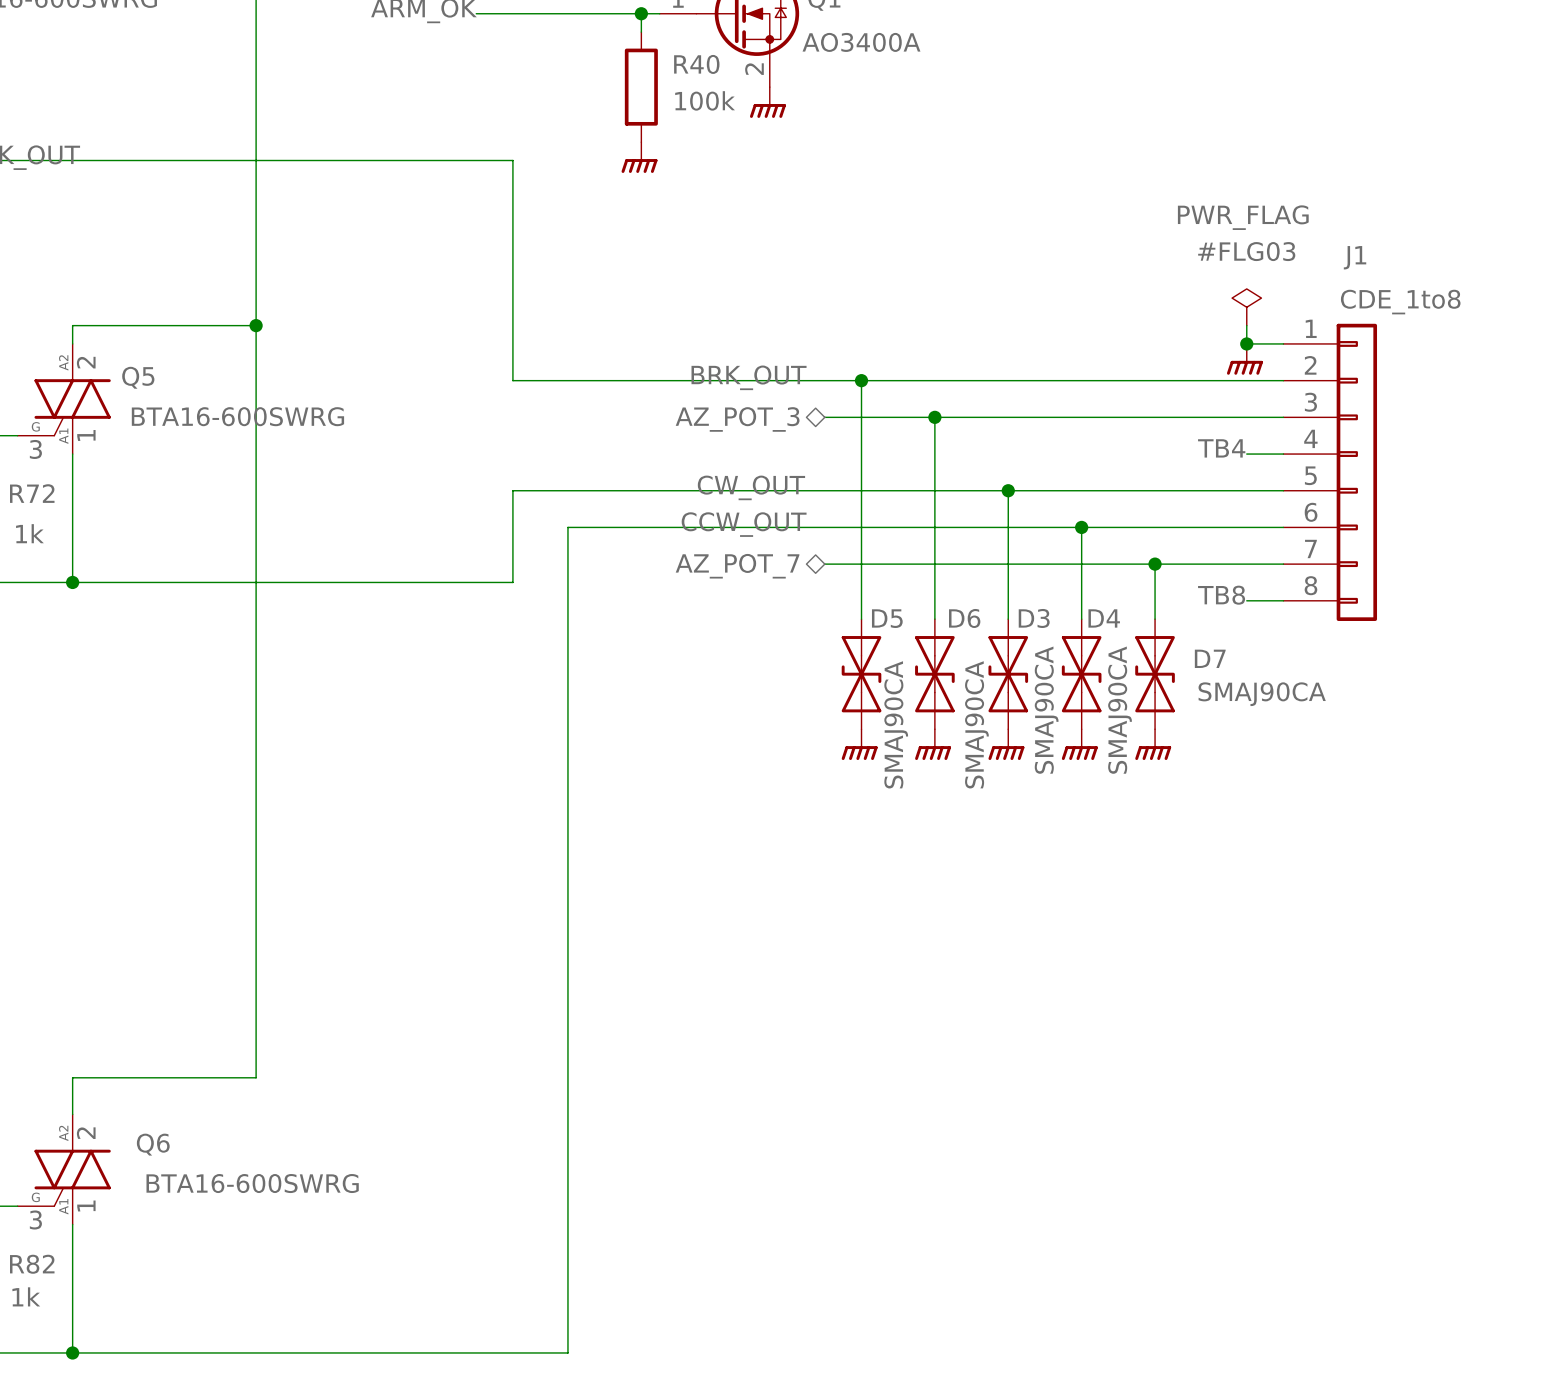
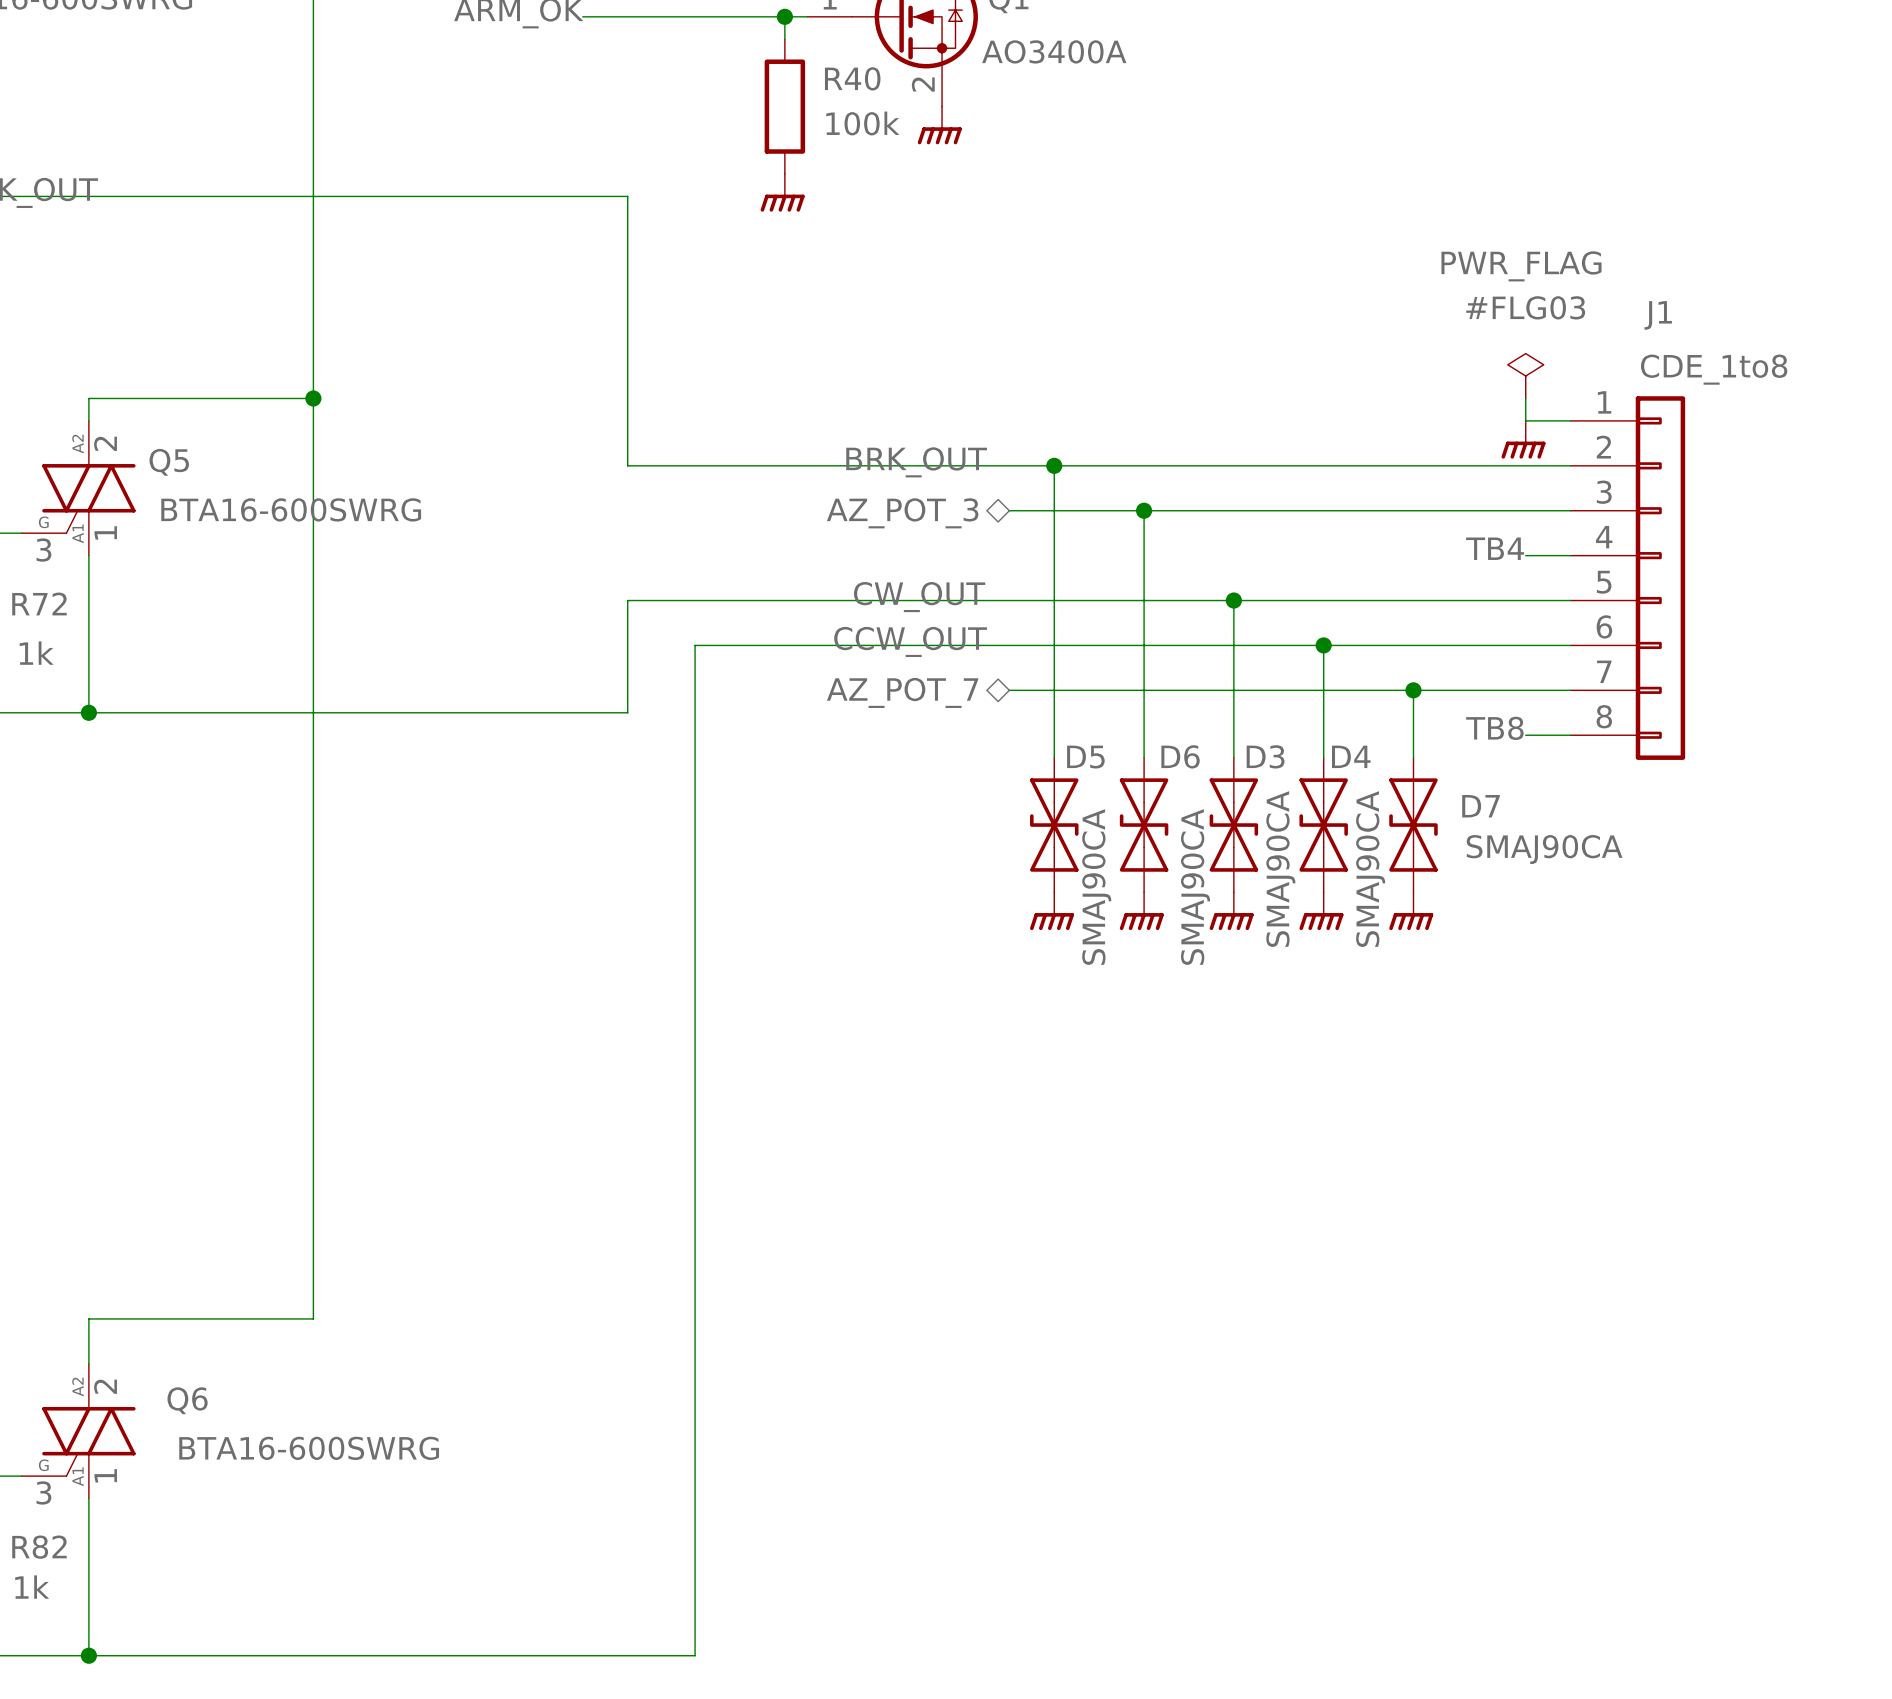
junction: (1246, 343) -> none

